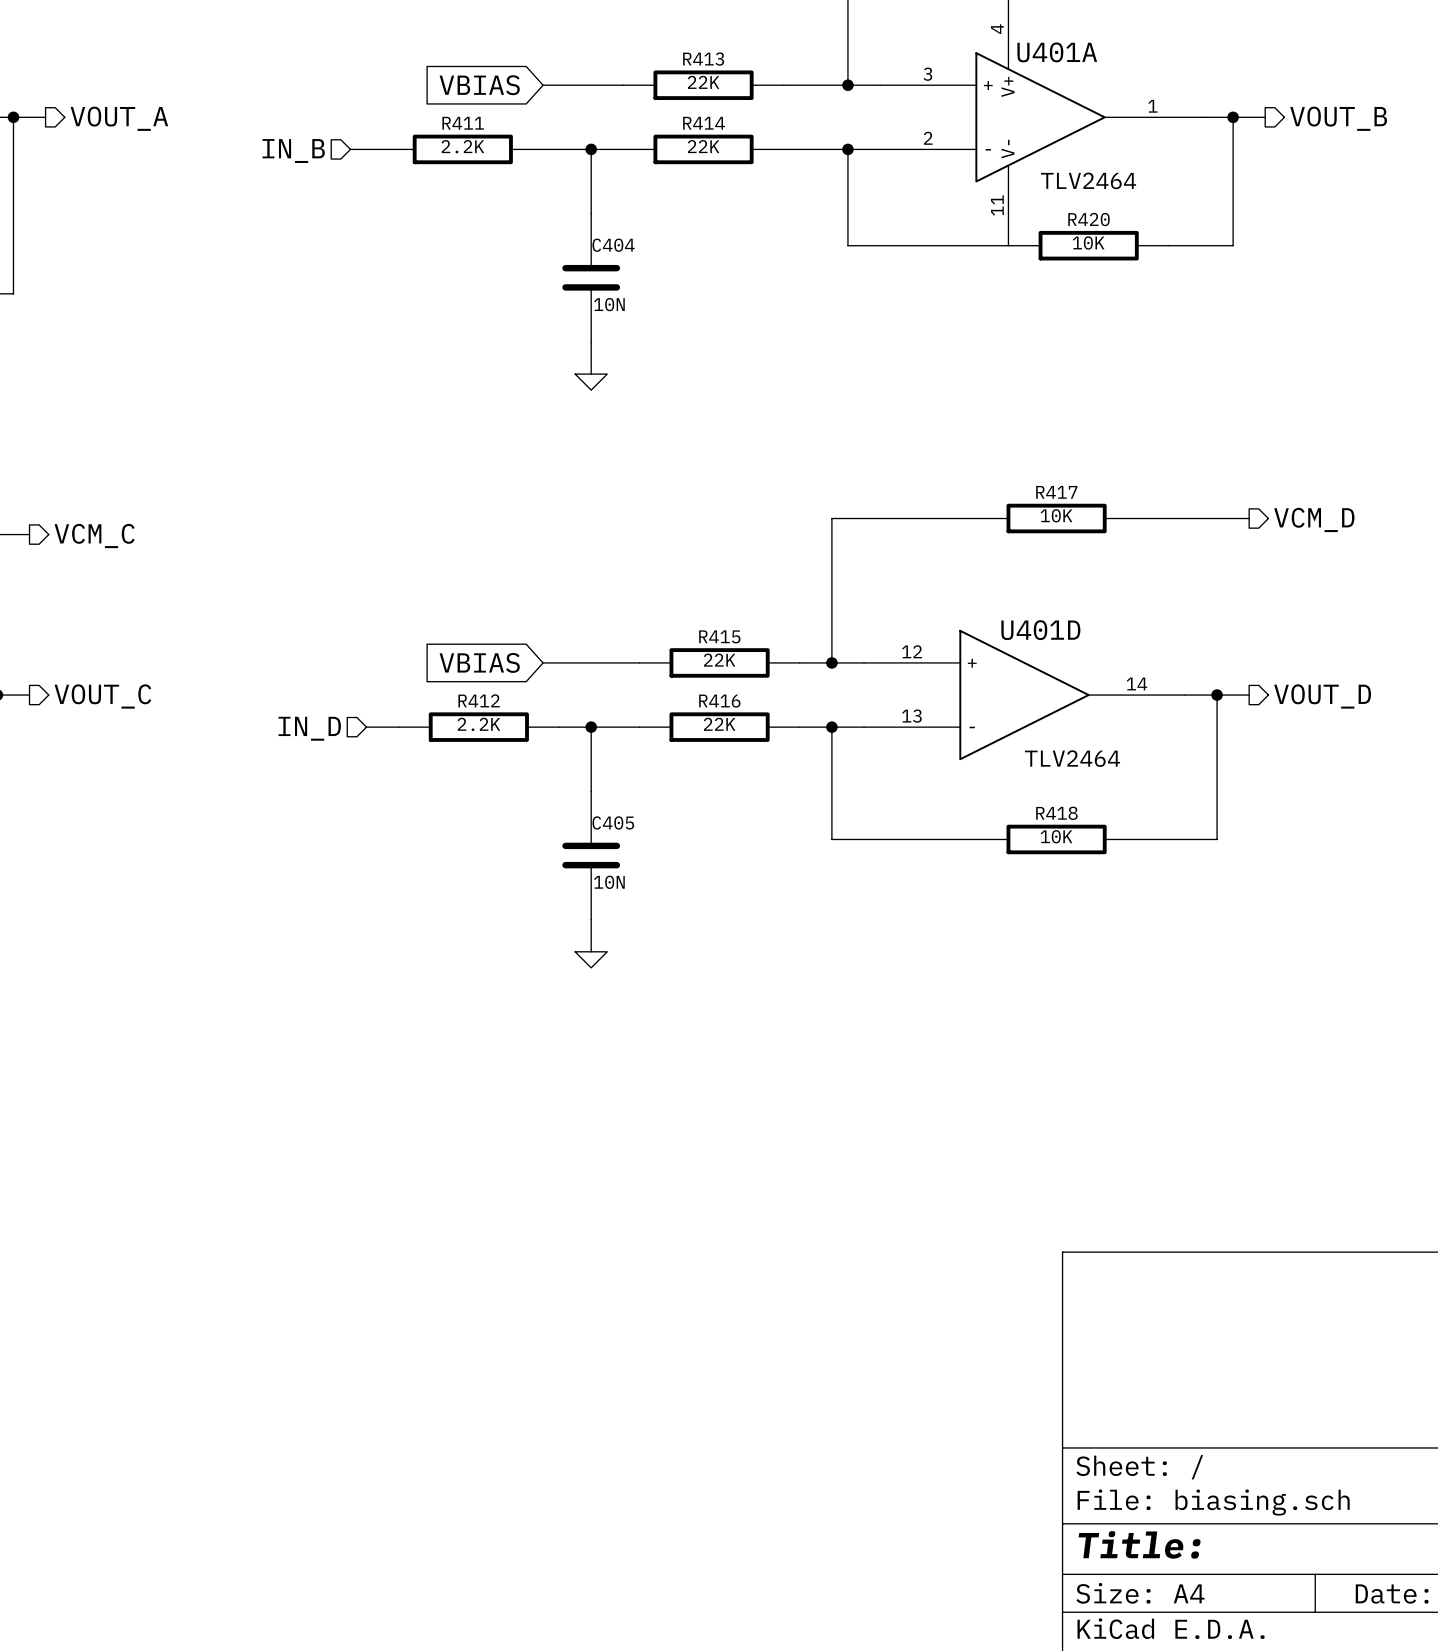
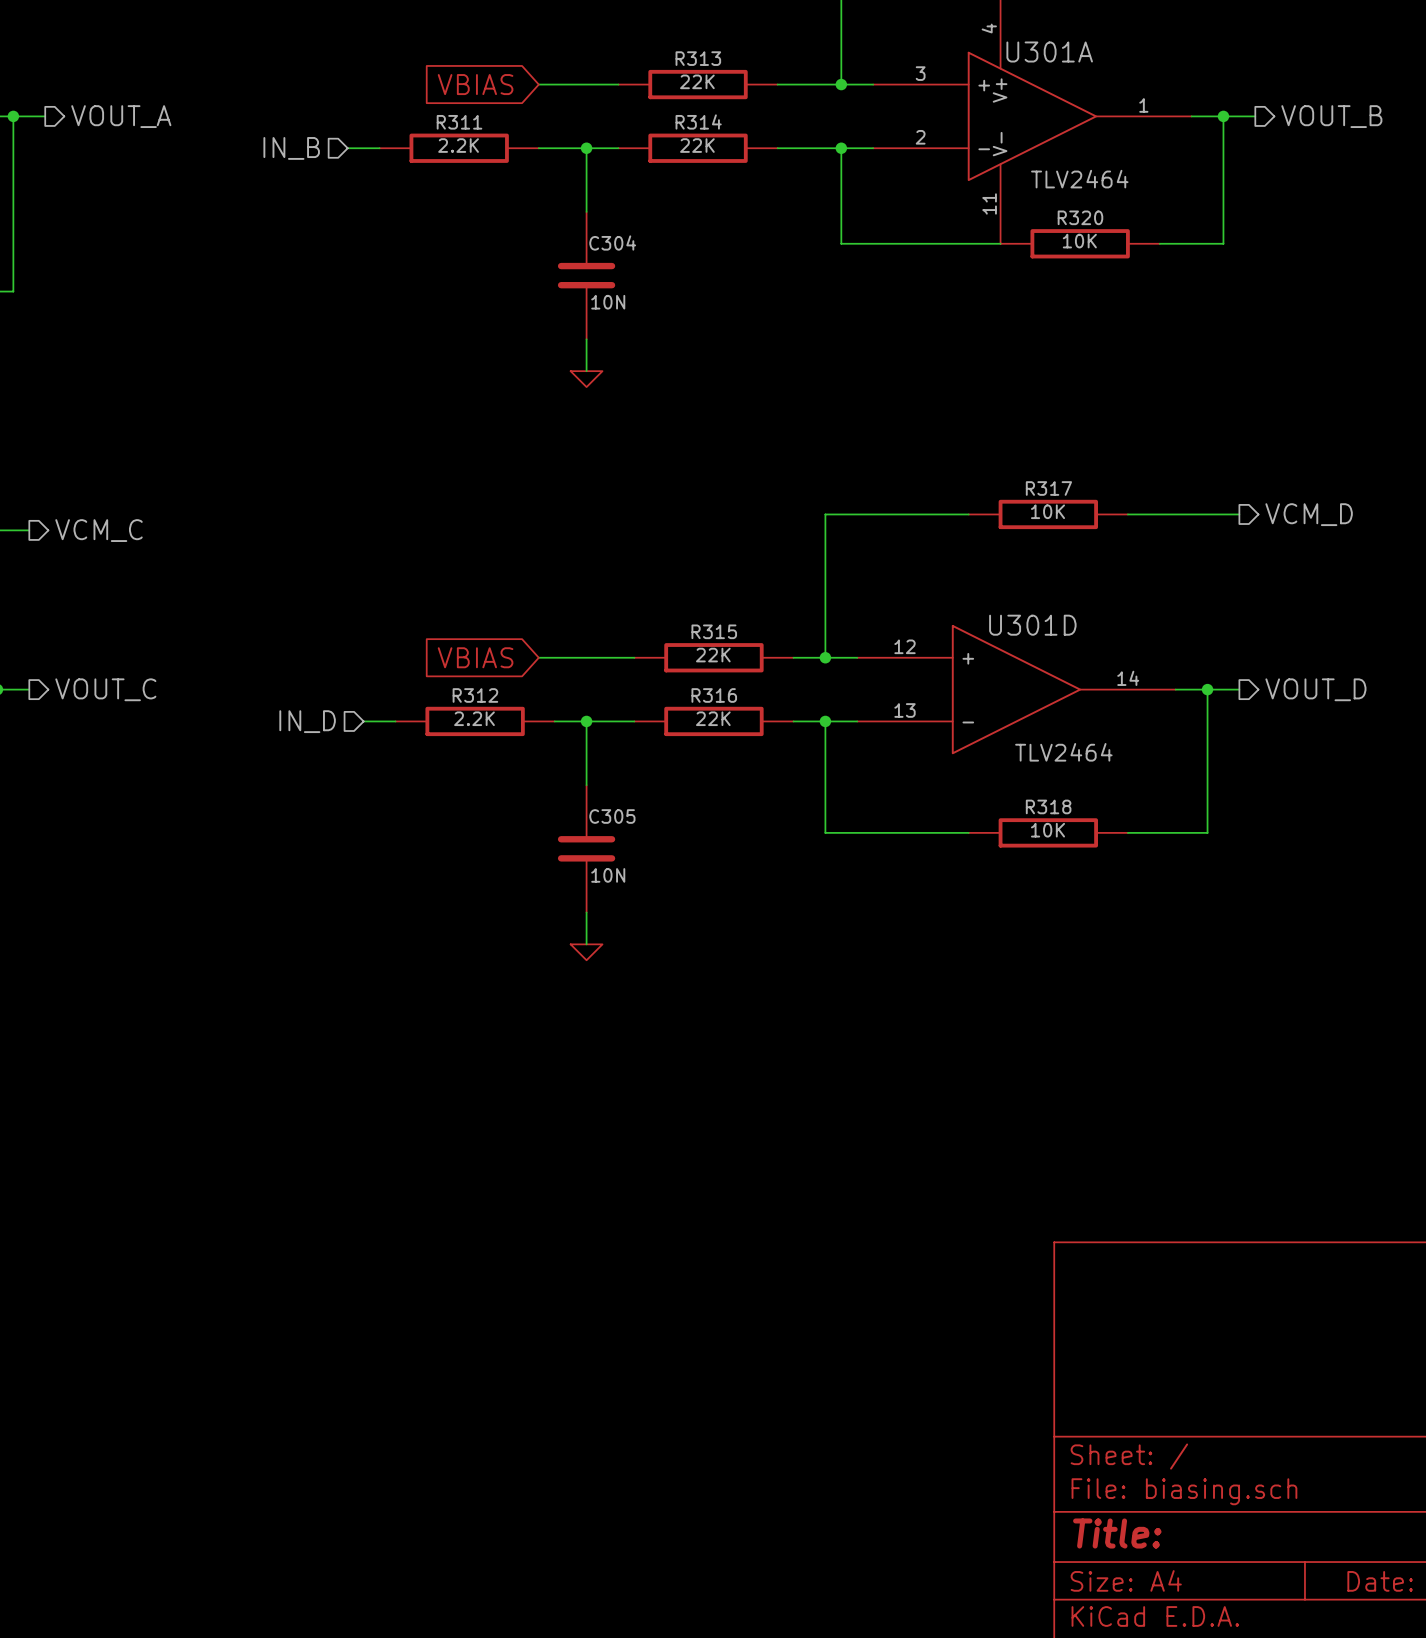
U401A name: U401A (1057, 52) -> U301A (1049, 52)
R413 name: R413 (703, 59) -> R313 (698, 58)
R411 name: R411 (463, 123) -> R311 (459, 122)
R414 name: R414 (704, 123) -> R314 (698, 121)
R420 name: R420 (1088, 219) -> R320 (1080, 217)
C404 name: C404 (613, 245) -> C304 (612, 243)
R417 name: R417 (1056, 492) -> R317 (1048, 488)
U401D name: U401D (1040, 630) -> U301D (1032, 625)
R415 name: R415 (719, 636) -> R315 (714, 631)
R412 name: R412 (479, 700) -> R312 (475, 695)
R416 name: R416 (719, 701) -> R316 (714, 695)
R418 name: R418 (1056, 813) -> R318 (1048, 806)
C405 name: C405 (613, 822) -> C305 (612, 816)

